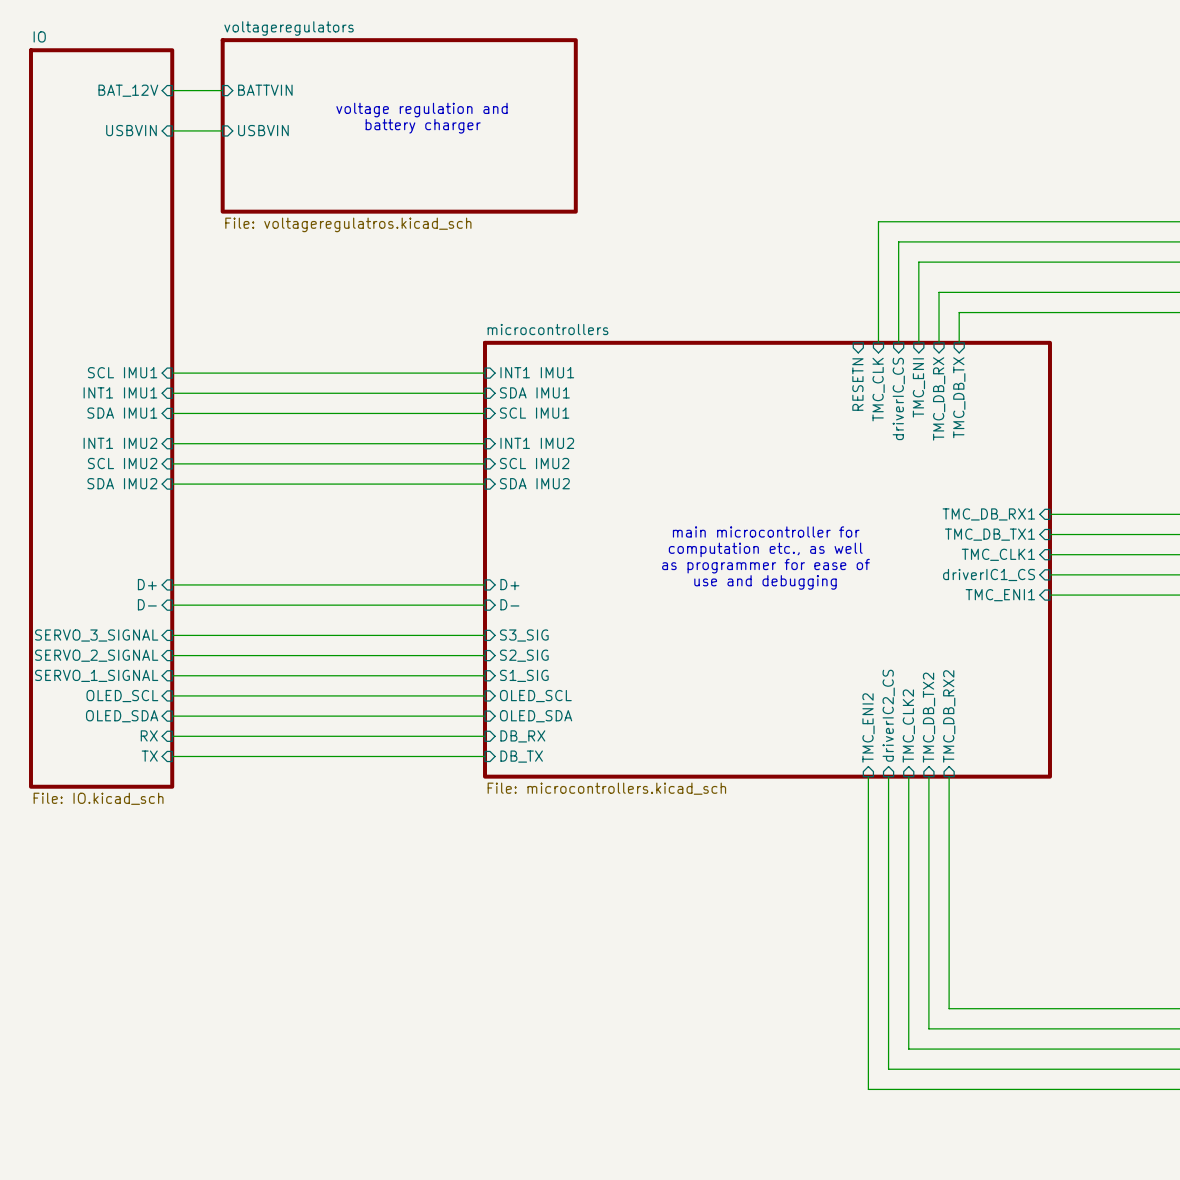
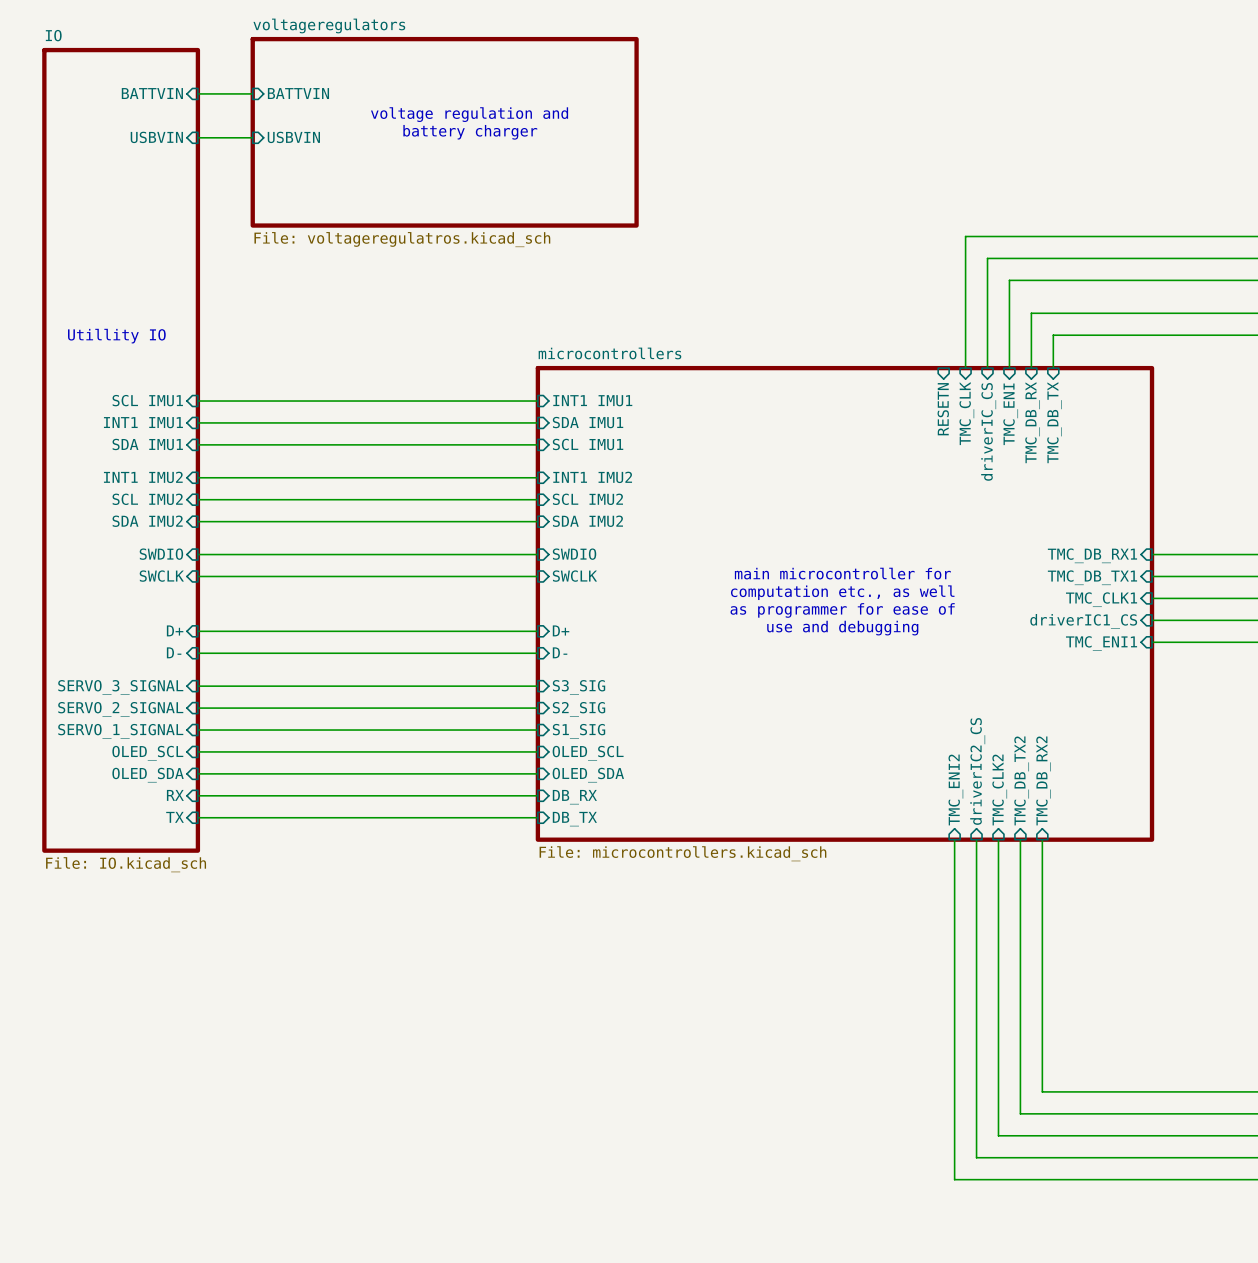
sheet pin: BAT_12V (128, 90) -> BATTVIN (152, 93)
text: none -> Utillity IO (116, 336)
sheet pin: none -> SWDIO (161, 554)
sheet pin: none -> SWDIO (574, 554)
wire: none -> (197, 554) (537, 554)
sheet pin: none -> SWCLK (161, 576)
wire: none -> (197, 576) (537, 576)
sheet pin: none -> SWCLK (574, 576)

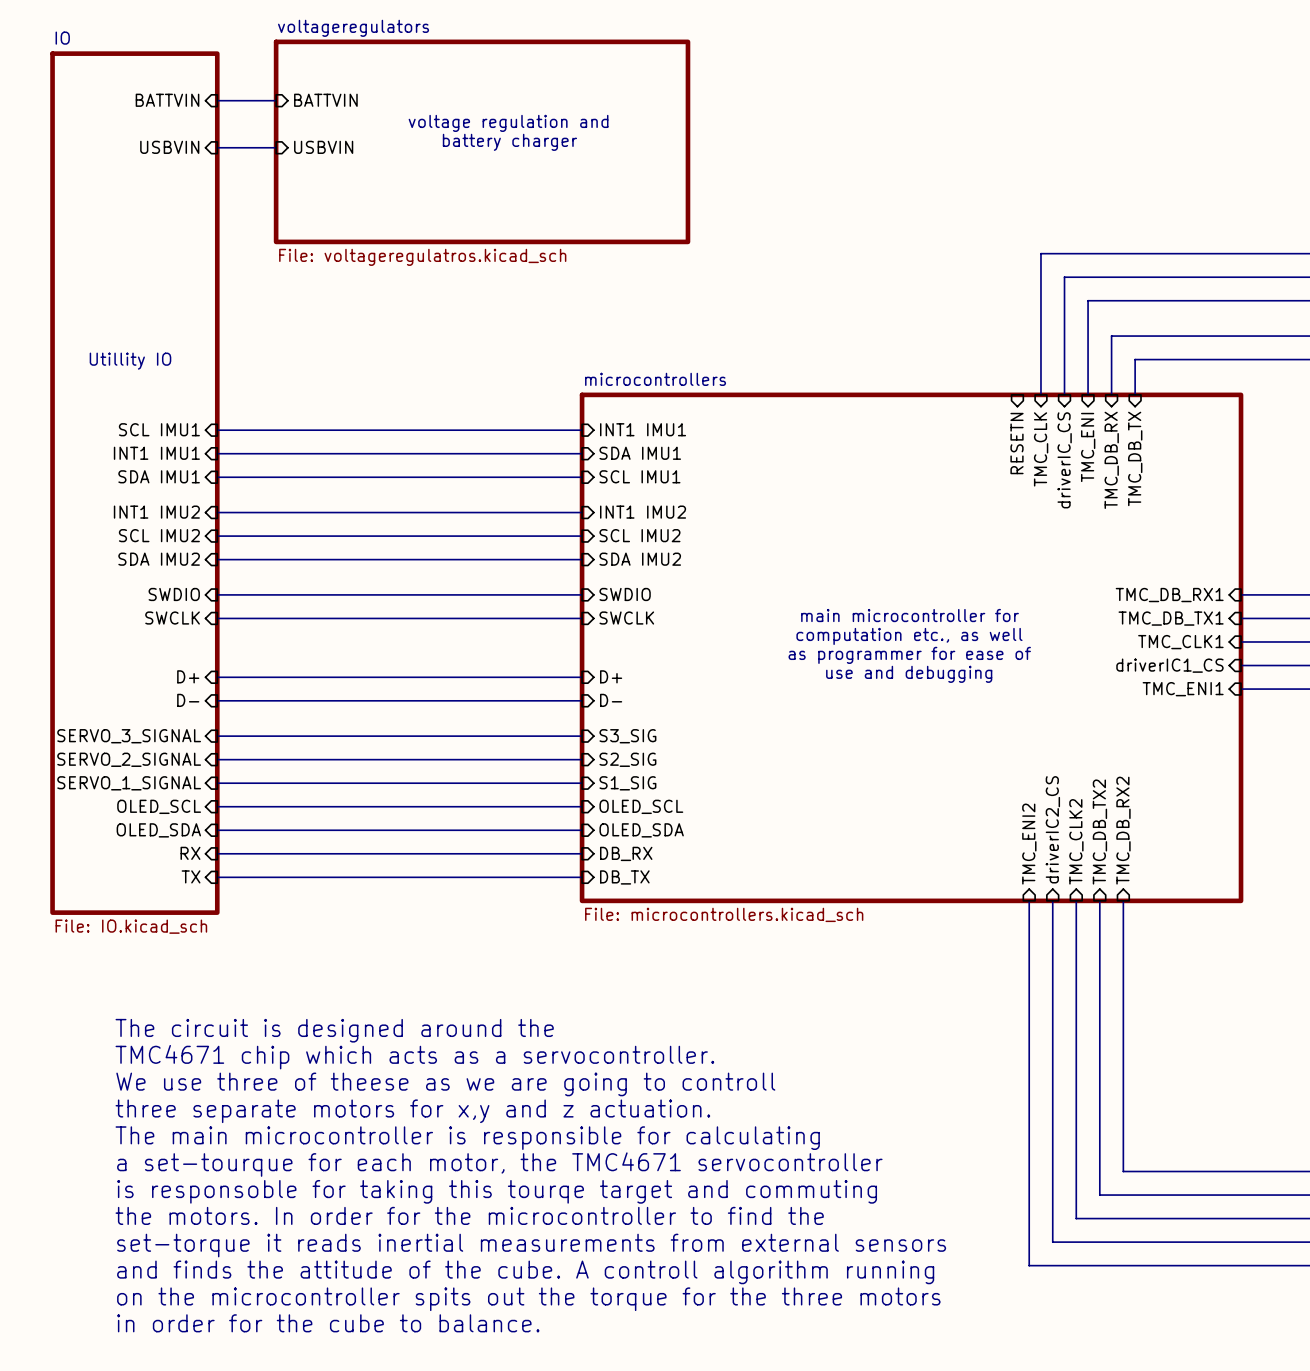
text: none -> The circuit is designed around the (334, 1030)
text: none -> TMC4671 chip which acts as a servocontroller. (414, 1057)
text: none -> We use three of theese as we are going to controll (445, 1084)
text: none -> three separate motors for x,y and z actuation. (412, 1111)
text: none -> The main microcontroller is responsible for calculating (467, 1138)
text: none -> a set-tourque for each motor, the TMC4671 servocontroller (499, 1164)
text: none -> is responsoble for taking this tourqe target and commuting (497, 1191)
text: none -> the motors. In order for the microcontroller to find the (469, 1215)
text: none -> set-torque it reads inertial measurements from external sensors (531, 1245)
text: none -> and finds the attitude of the cube. A controll algorithm running (525, 1272)
text: none -> on the microcontroller spits out the torque for the three motors (528, 1299)
text: none -> in order for the cube to balance. (328, 1323)

